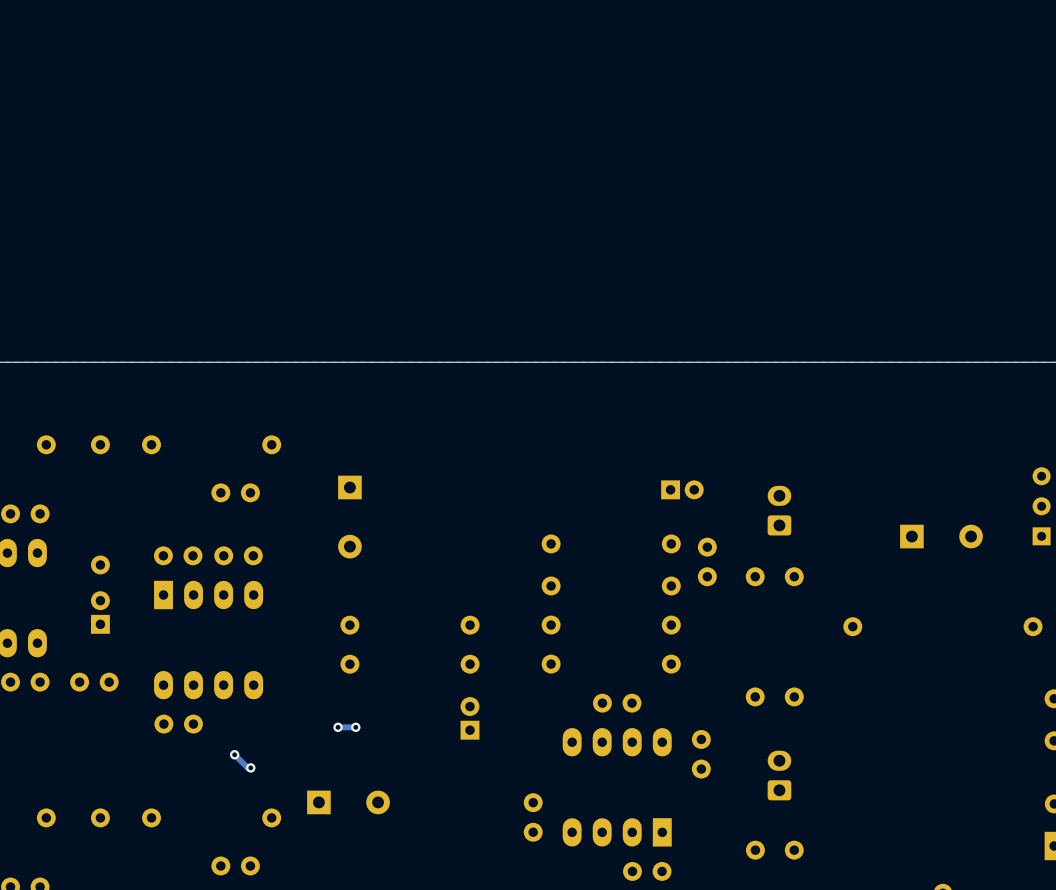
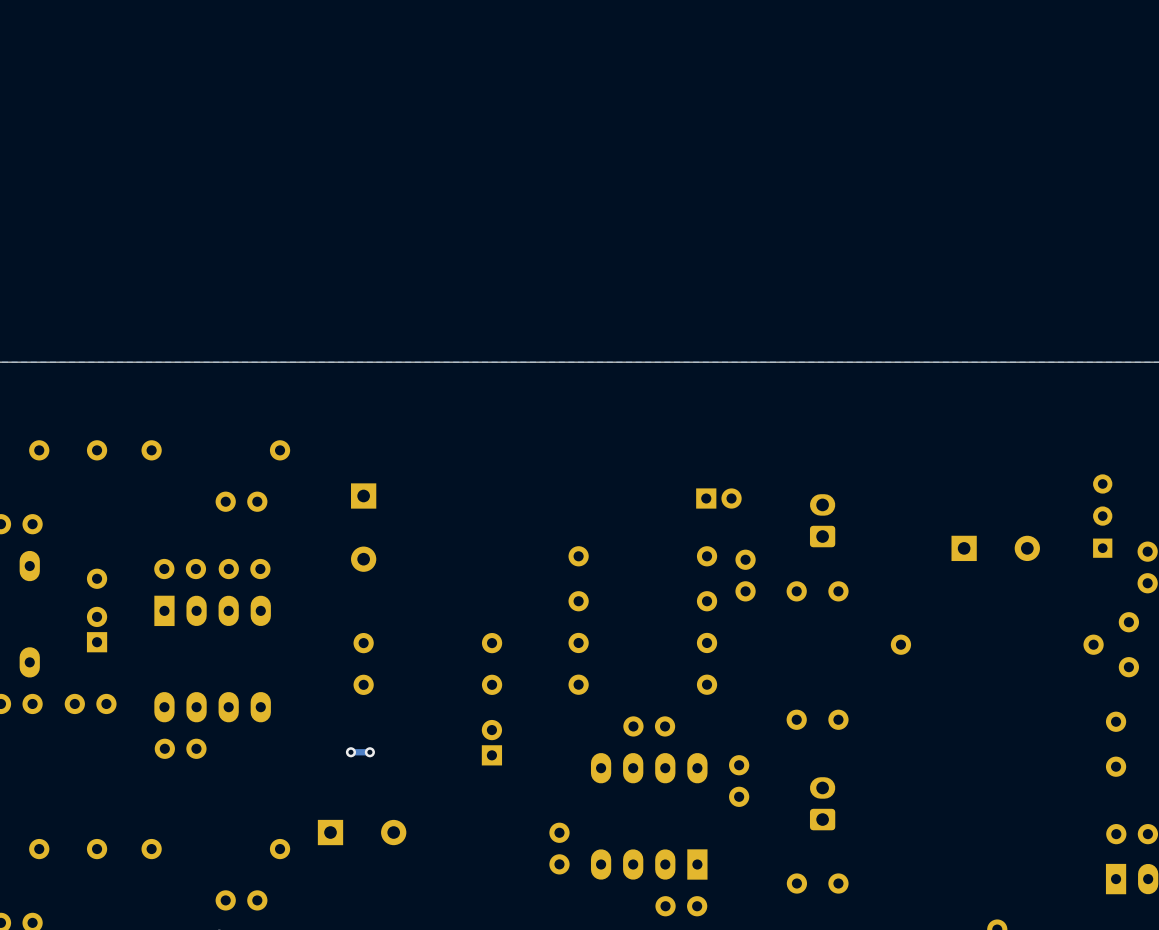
track: (234, 754) (247, 767) (250, 767) -> none
via: (234, 754) -> none
via: (250, 767) -> none

